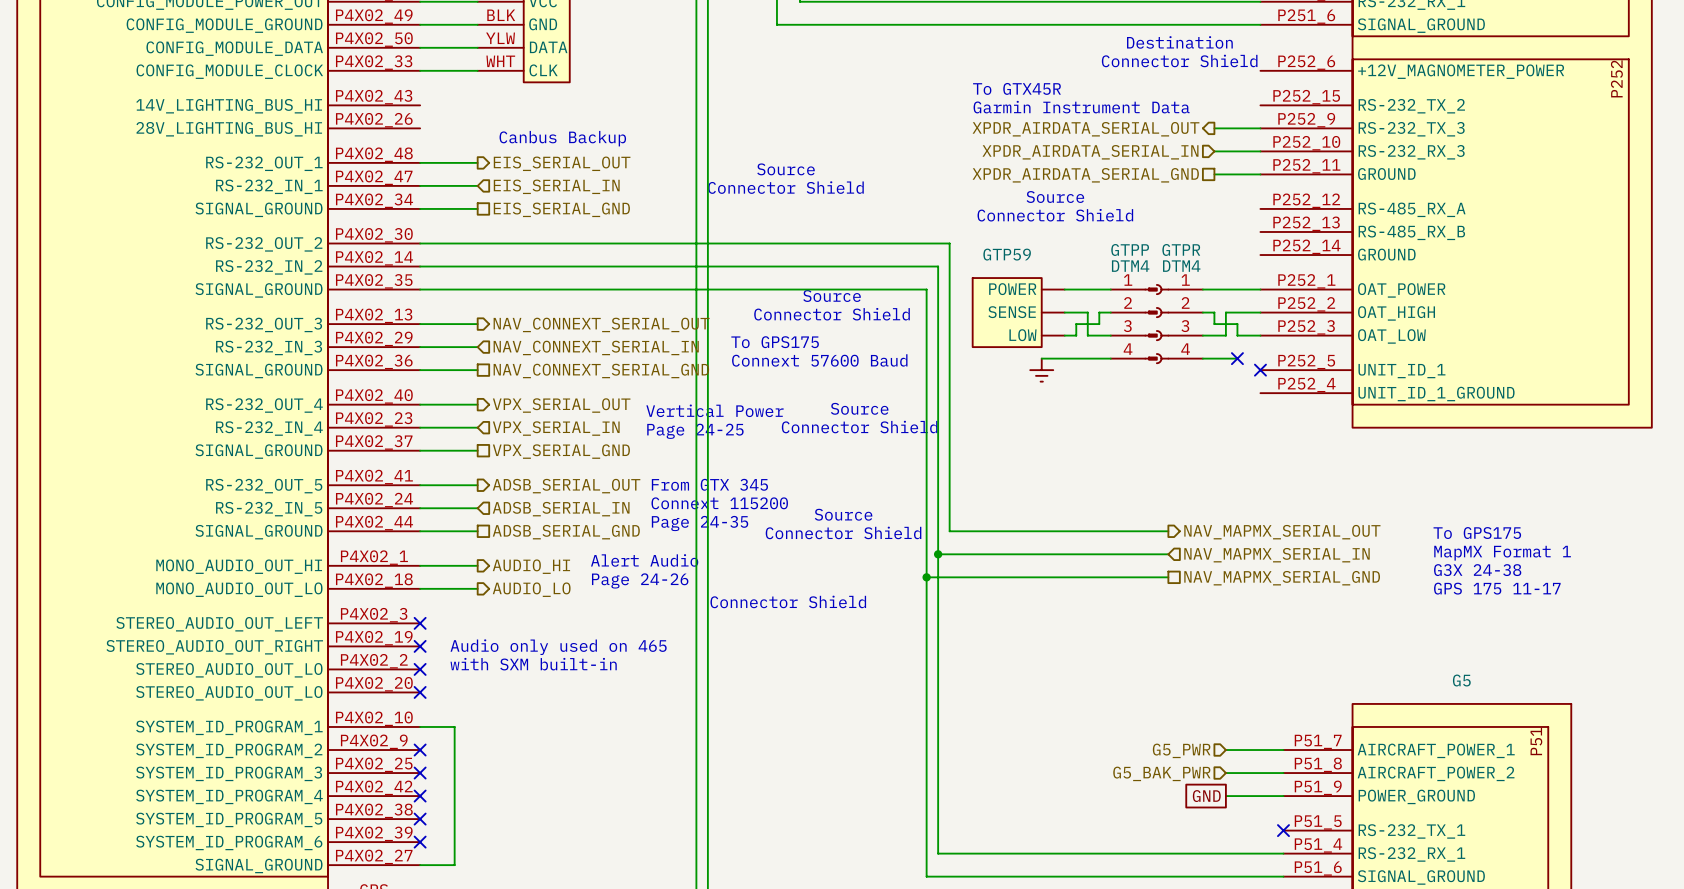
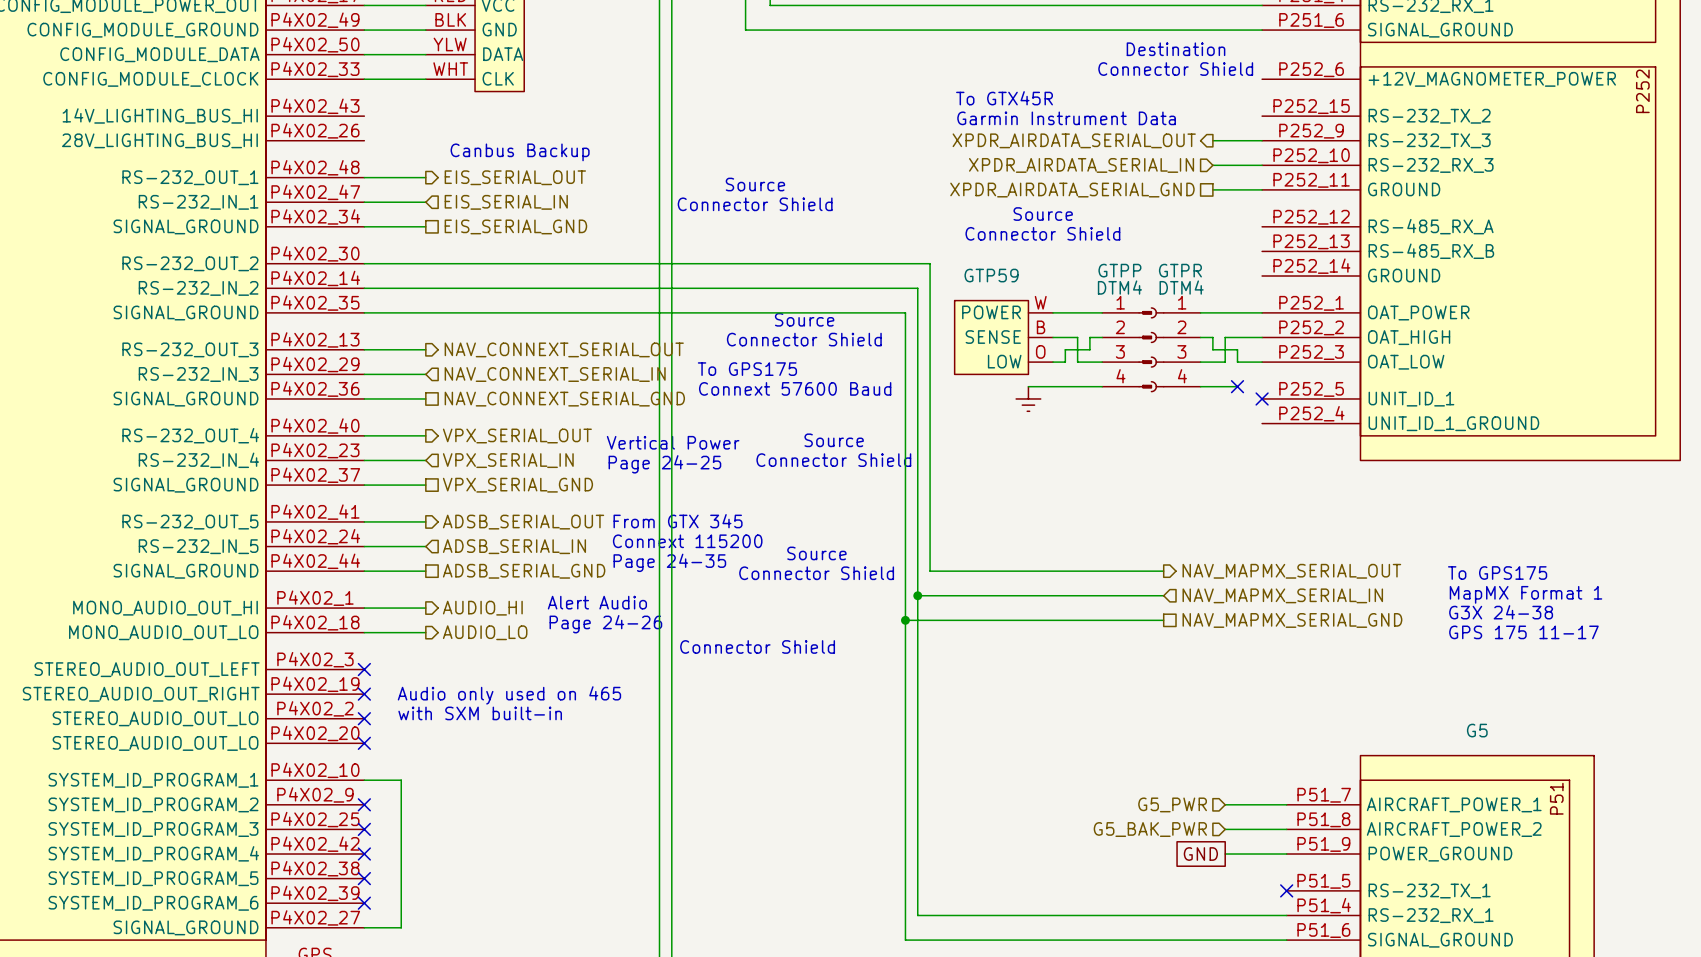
GTP59 pin number: none -> W (1040, 302)
GTP59 pin number: none -> B (1041, 327)
GTP59 pin number: none -> O (1040, 351)

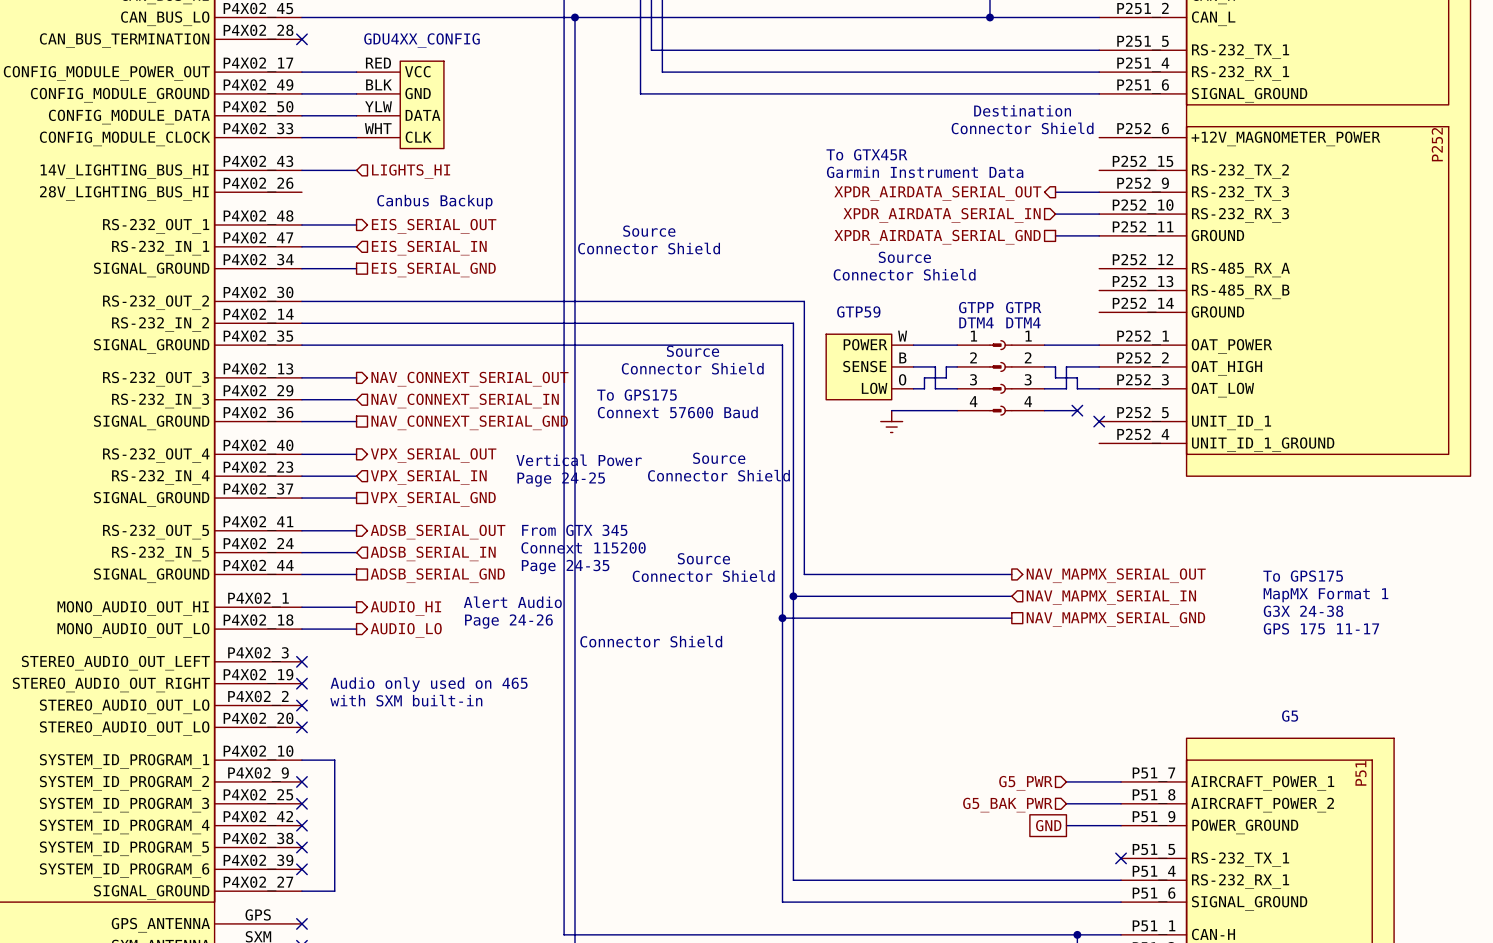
wire: none -> (301, 170) (356, 170)
hierarchical label: none -> LIGHTS_HI (411, 171)

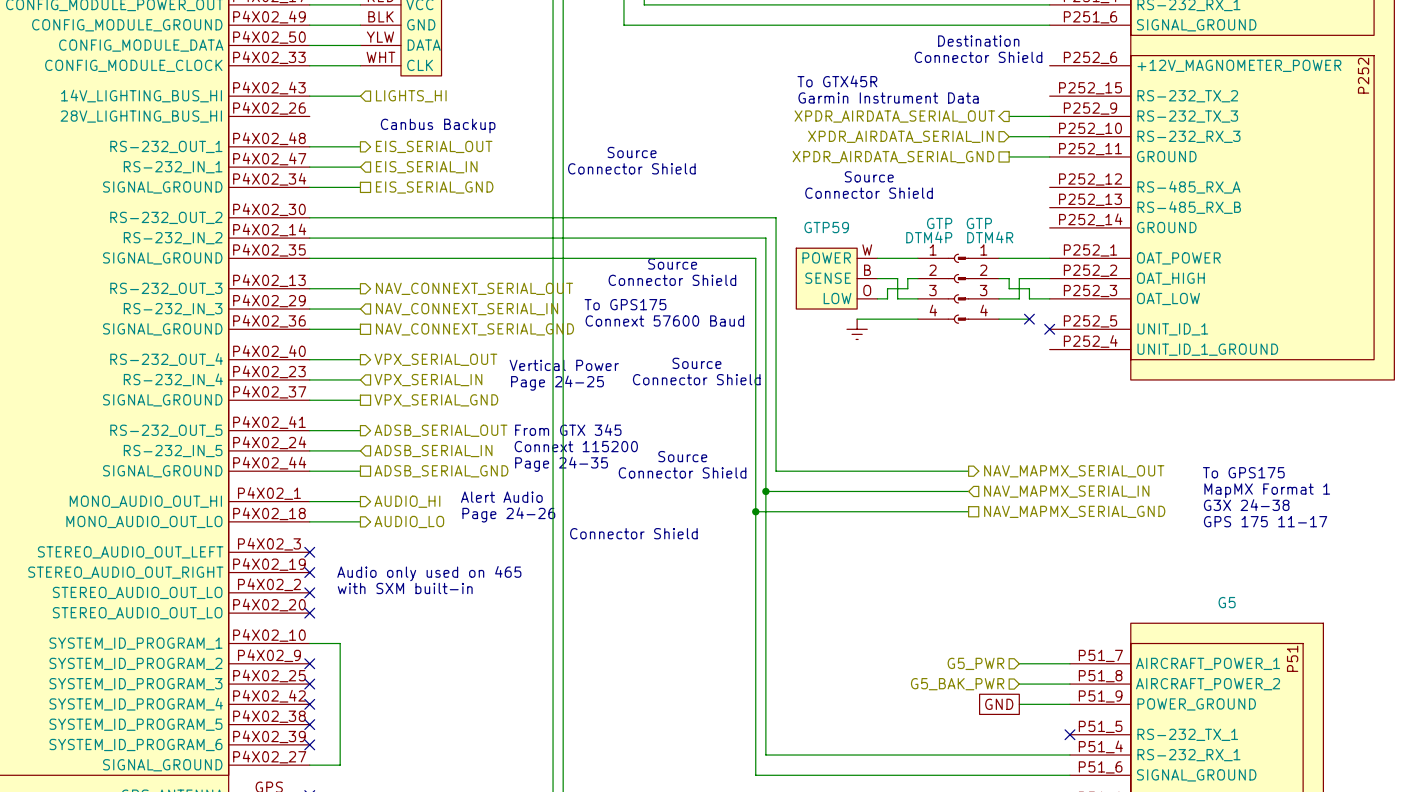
GTPP: DTM4 (979, 377) -> none
GTP: none -> DTM4P (938, 288)
GTPR: DTM4 (1022, 377) -> none
GTP: none -> DTM4R (978, 288)

